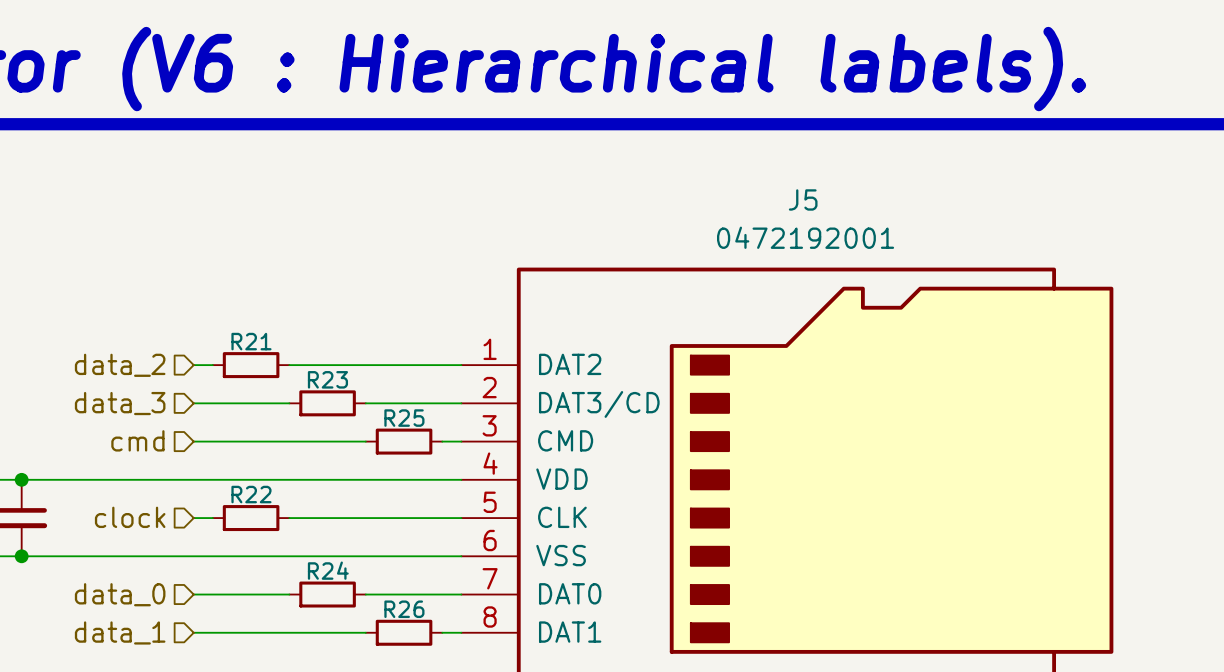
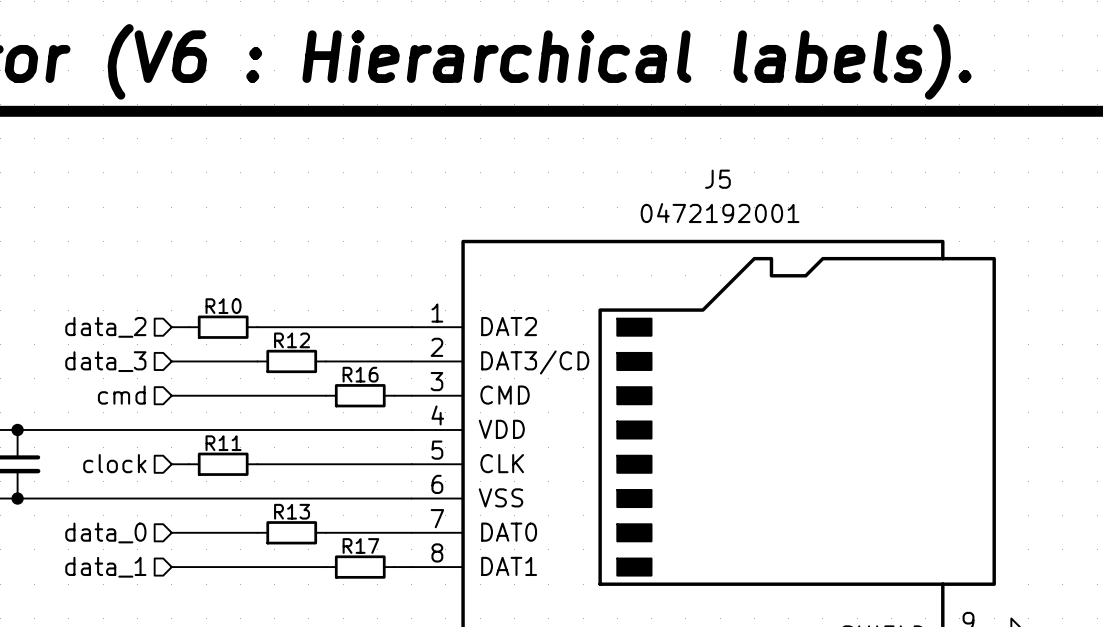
R21 name: R21 (251, 341) -> R10 (223, 306)
R23 name: R23 (327, 379) -> R12 (292, 340)
R25 name: R25 (404, 418) -> R16 (360, 374)
R22 name: R22 (251, 494) -> R11 (223, 443)
R24 name: R24 (328, 570) -> R13 (292, 511)
R26 name: R26 (404, 609) -> R17 (360, 545)

